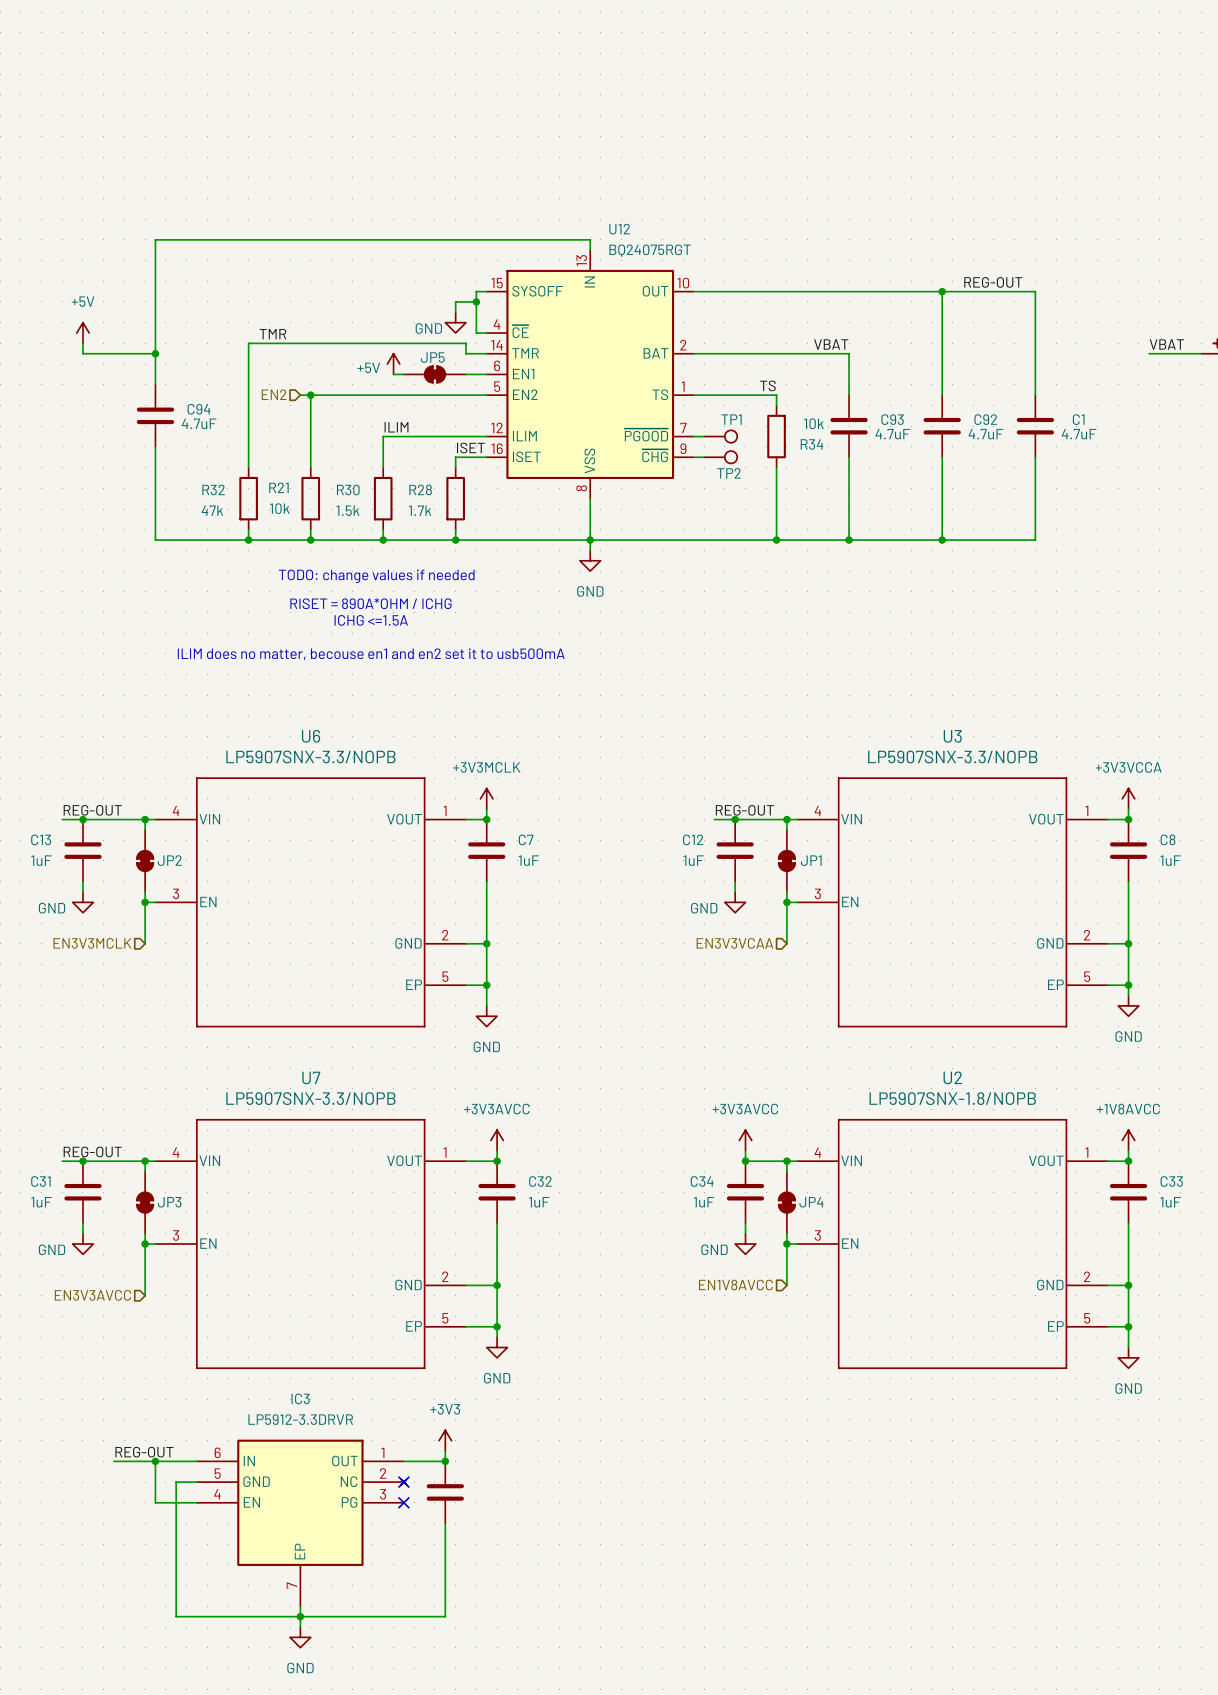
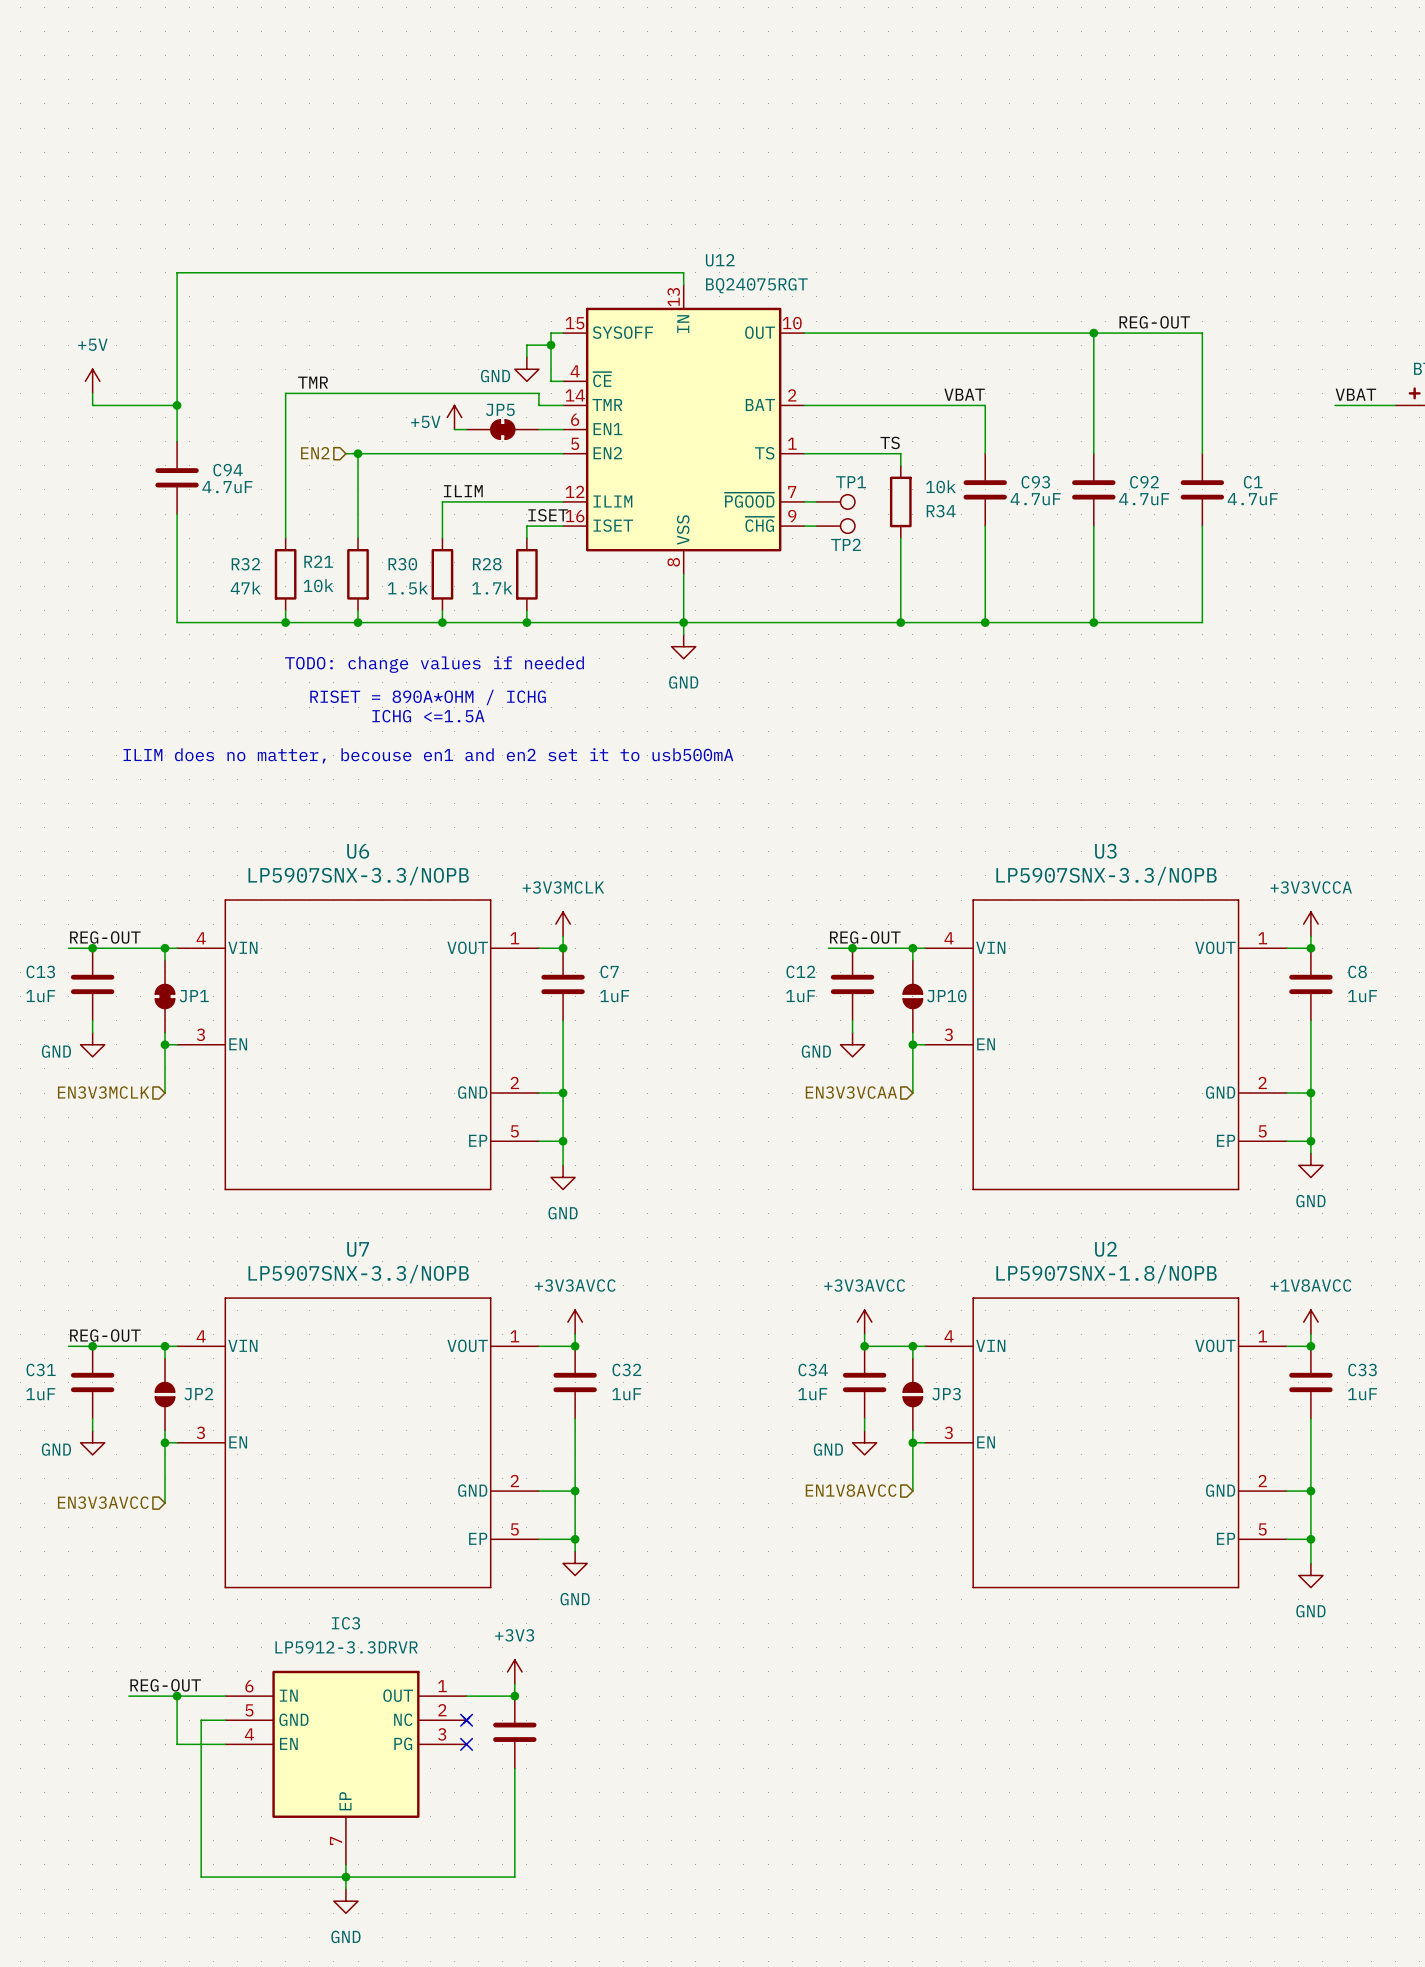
JP2 name: JP2 (169, 860) -> JP1 (194, 996)
JP1: (786, 860) -> none
JP10: none -> (912, 996)
JP3 symbol: [136, 1171, 154, 1234] -> [903, 1358, 923, 1431]
JP2: none -> (165, 1394)
JP4: (786, 1202) -> none

